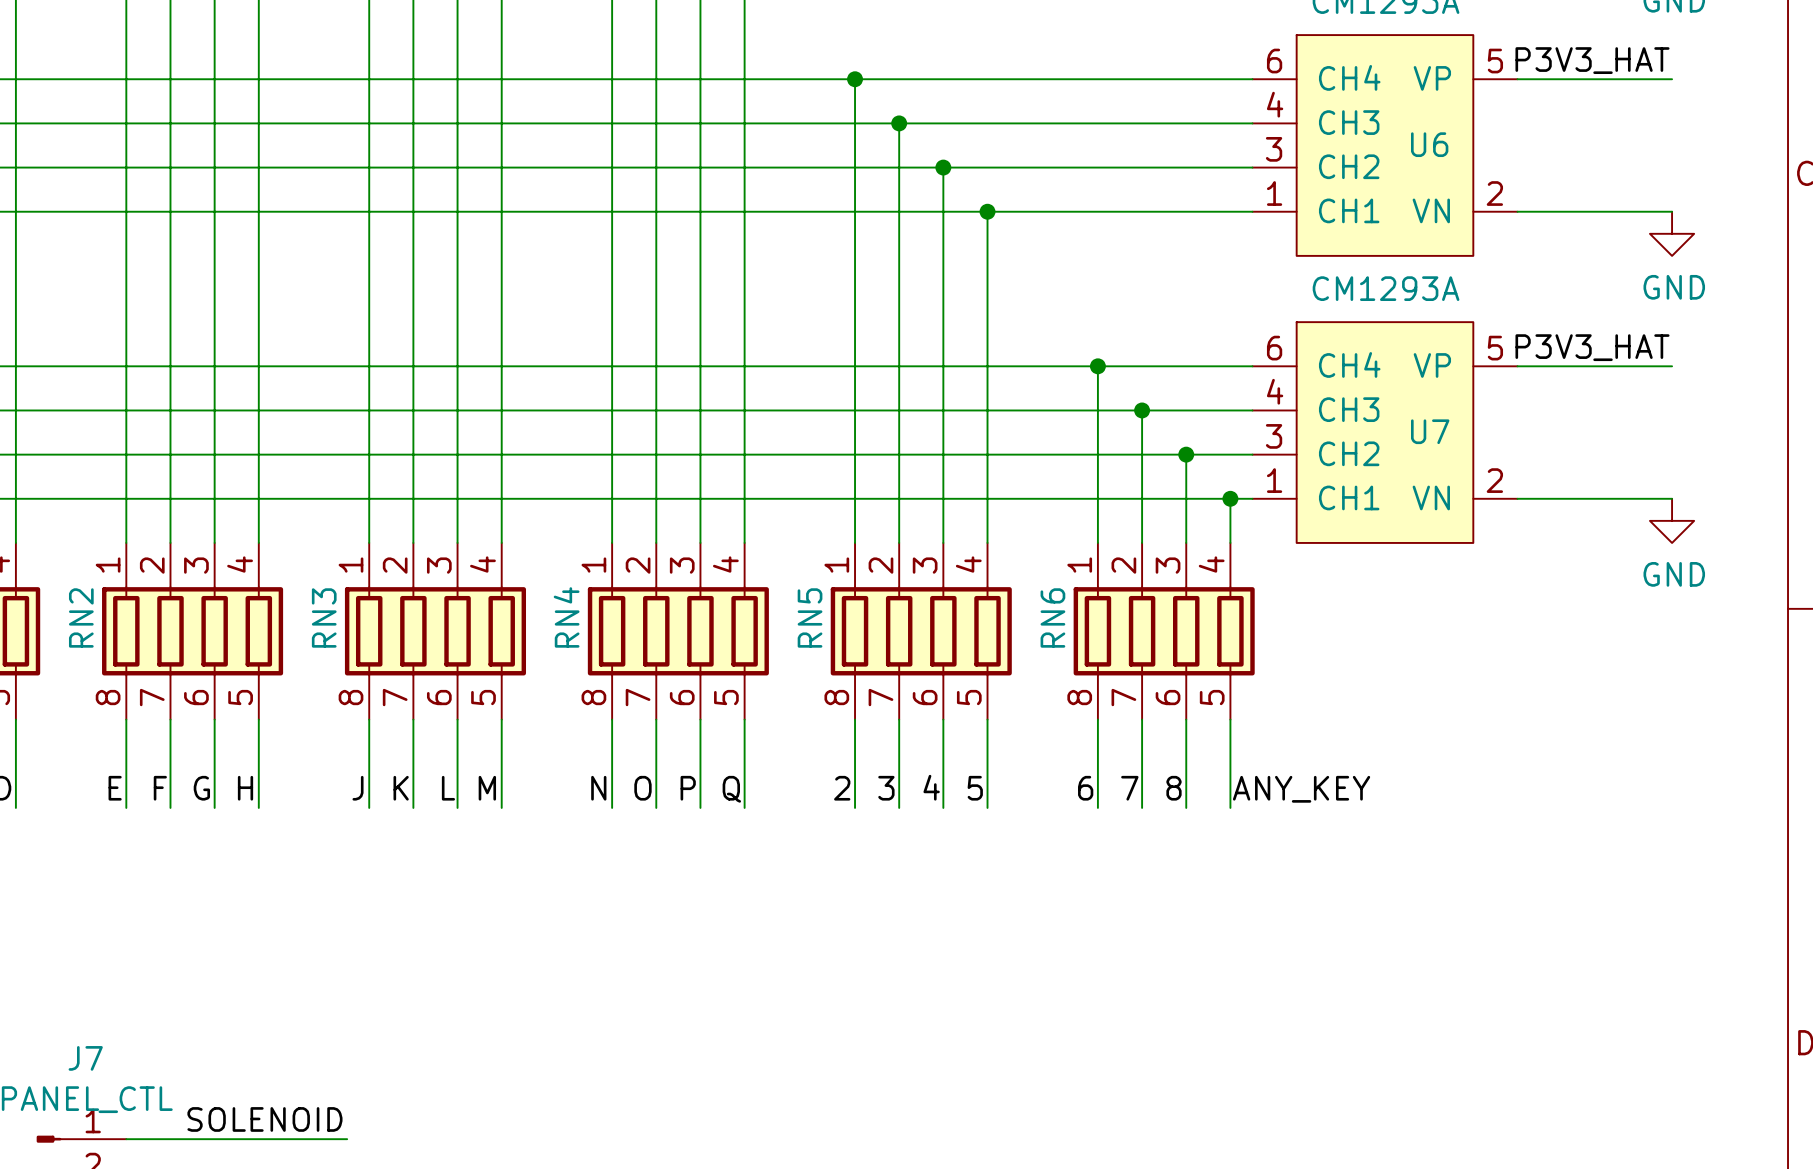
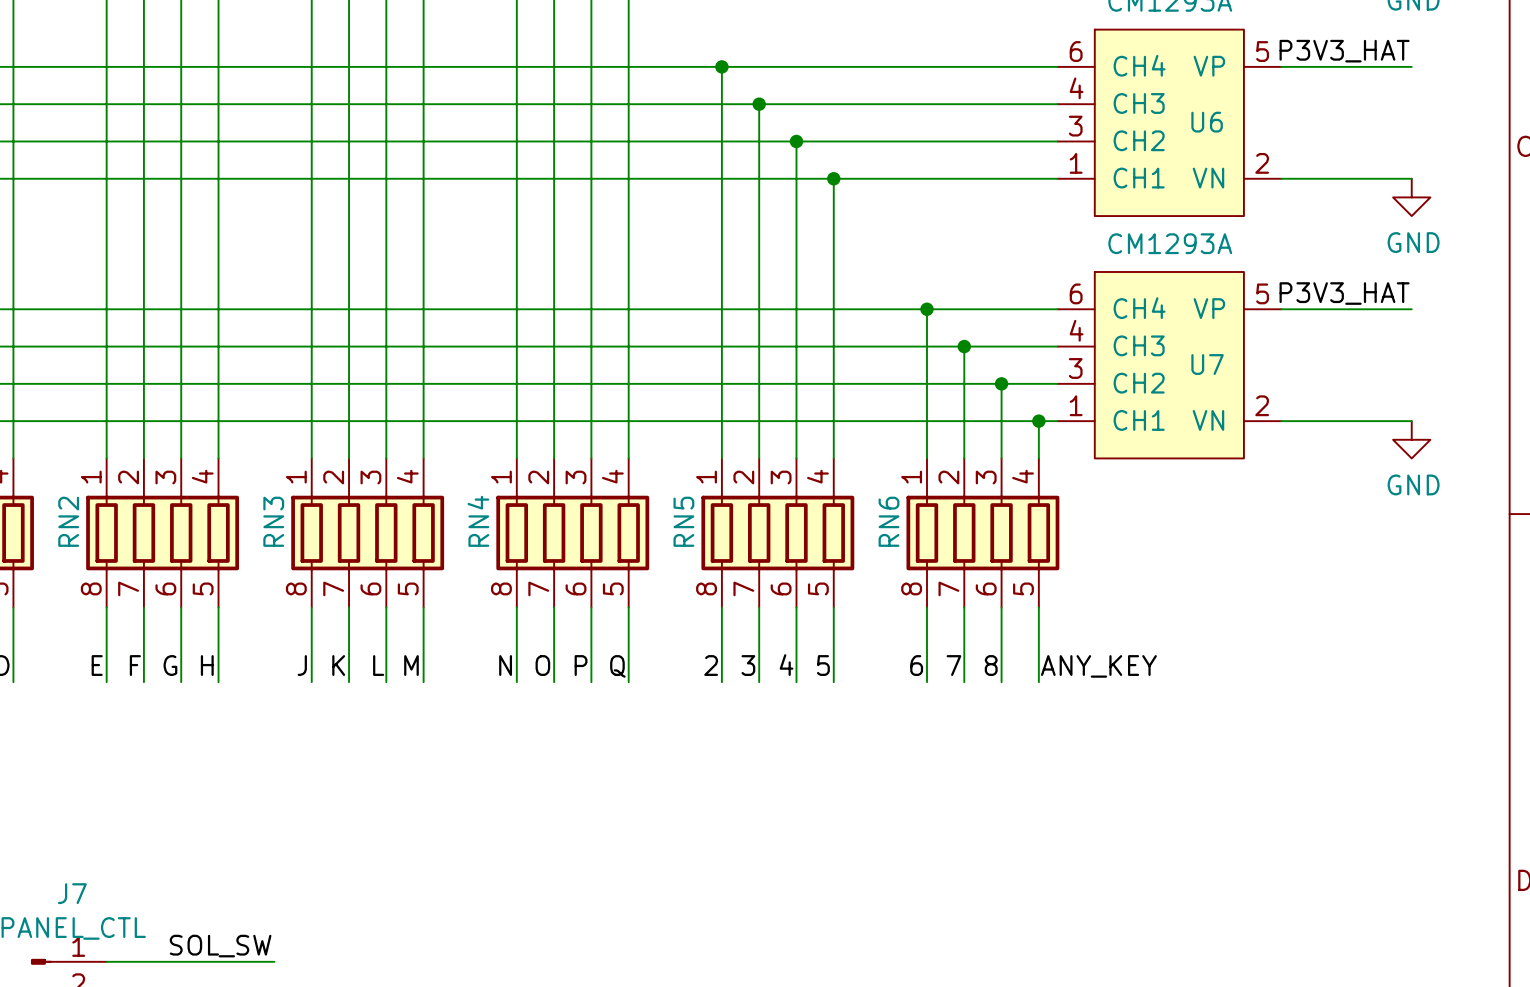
label: SOLENOID (264, 1119) -> none
label: none -> SOL_SW (220, 946)
wire: (325, 1139) (347, 1139) -> none

